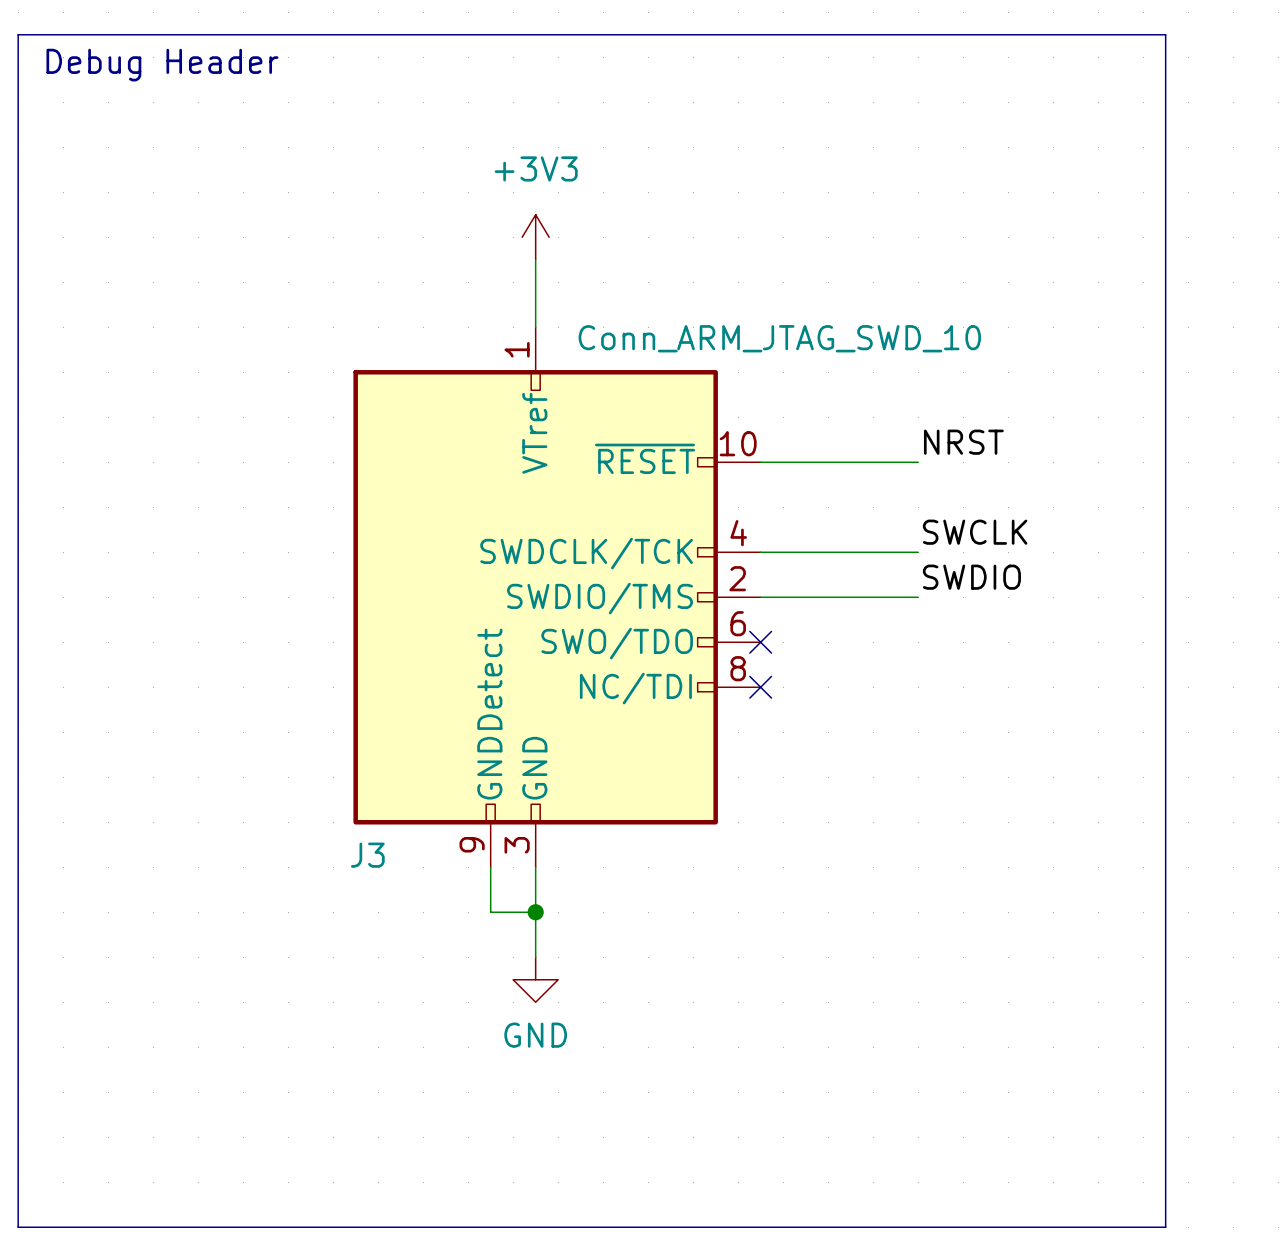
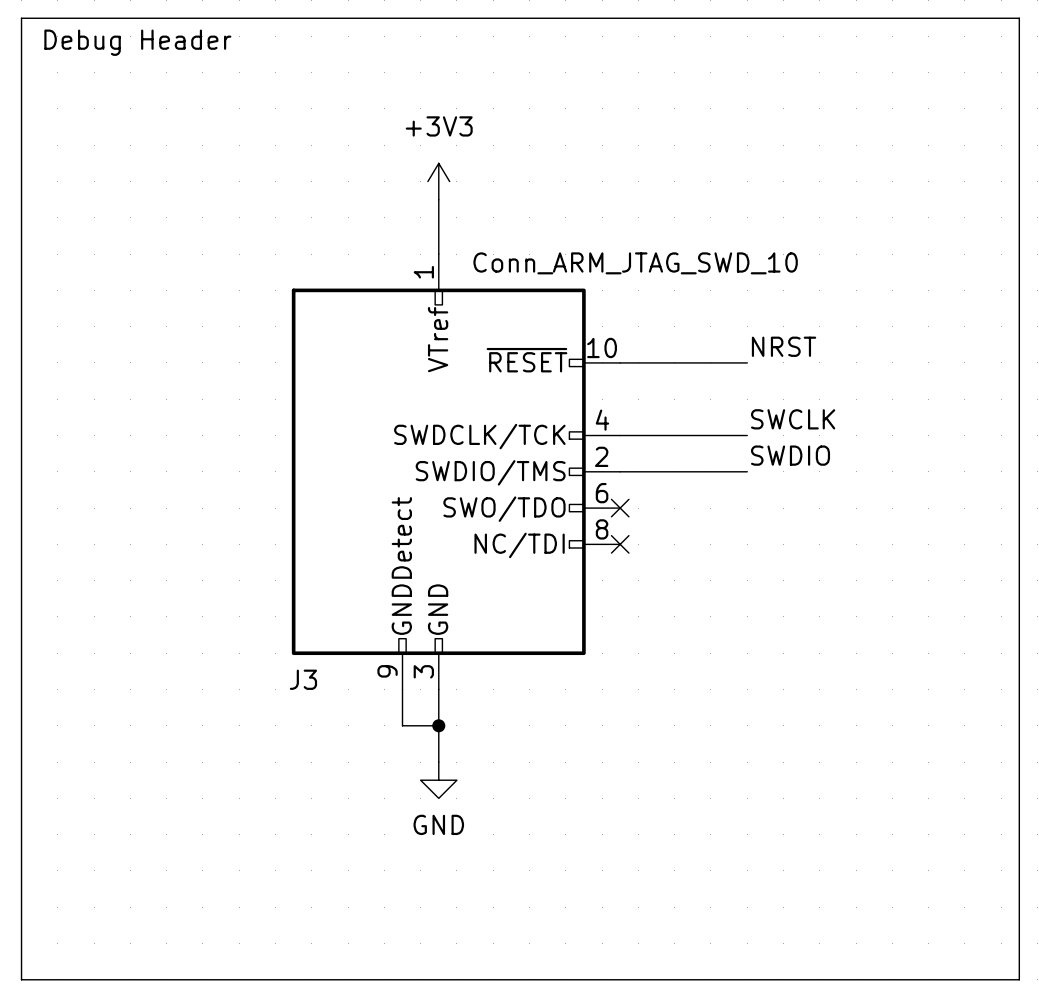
line: (1165, 34) (1165, 1227) -> (946, 18) (1019, 18) (1019, 979) (946, 979)

